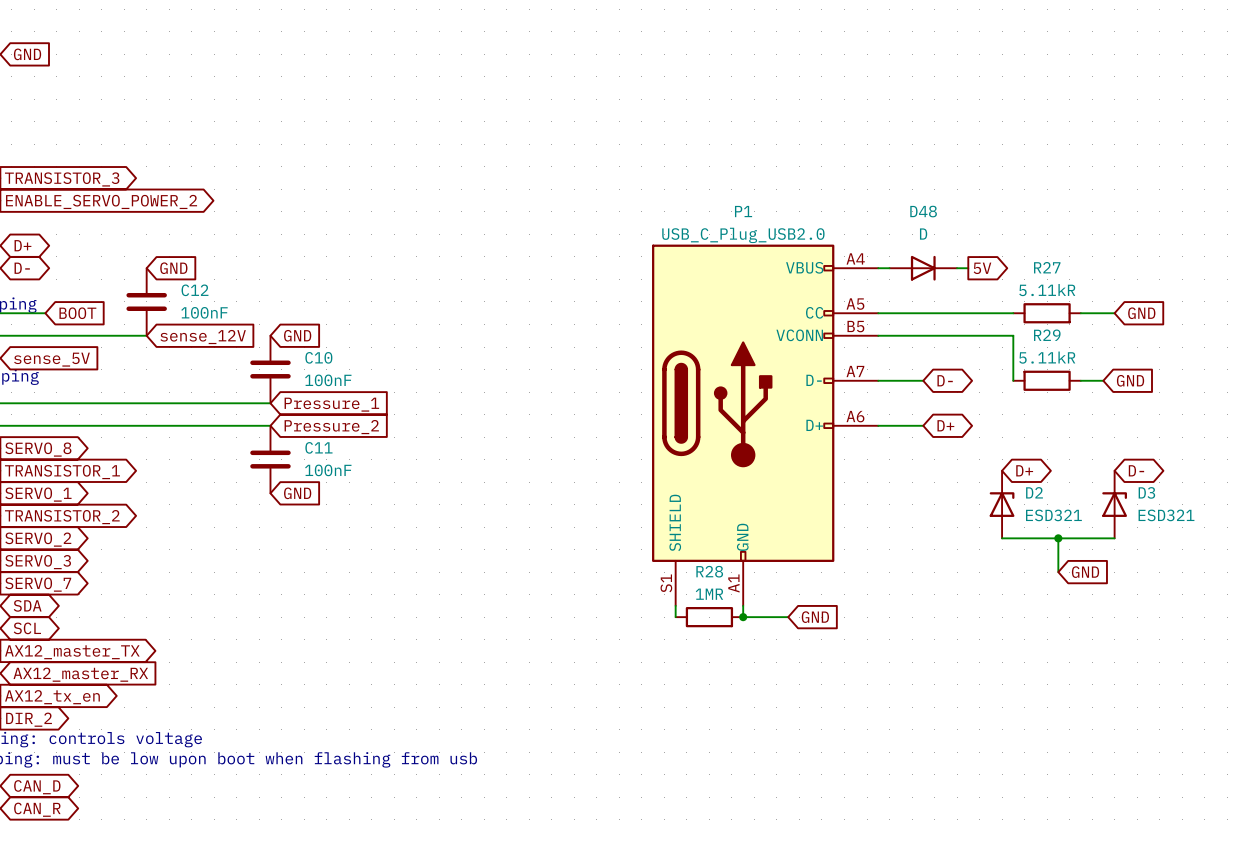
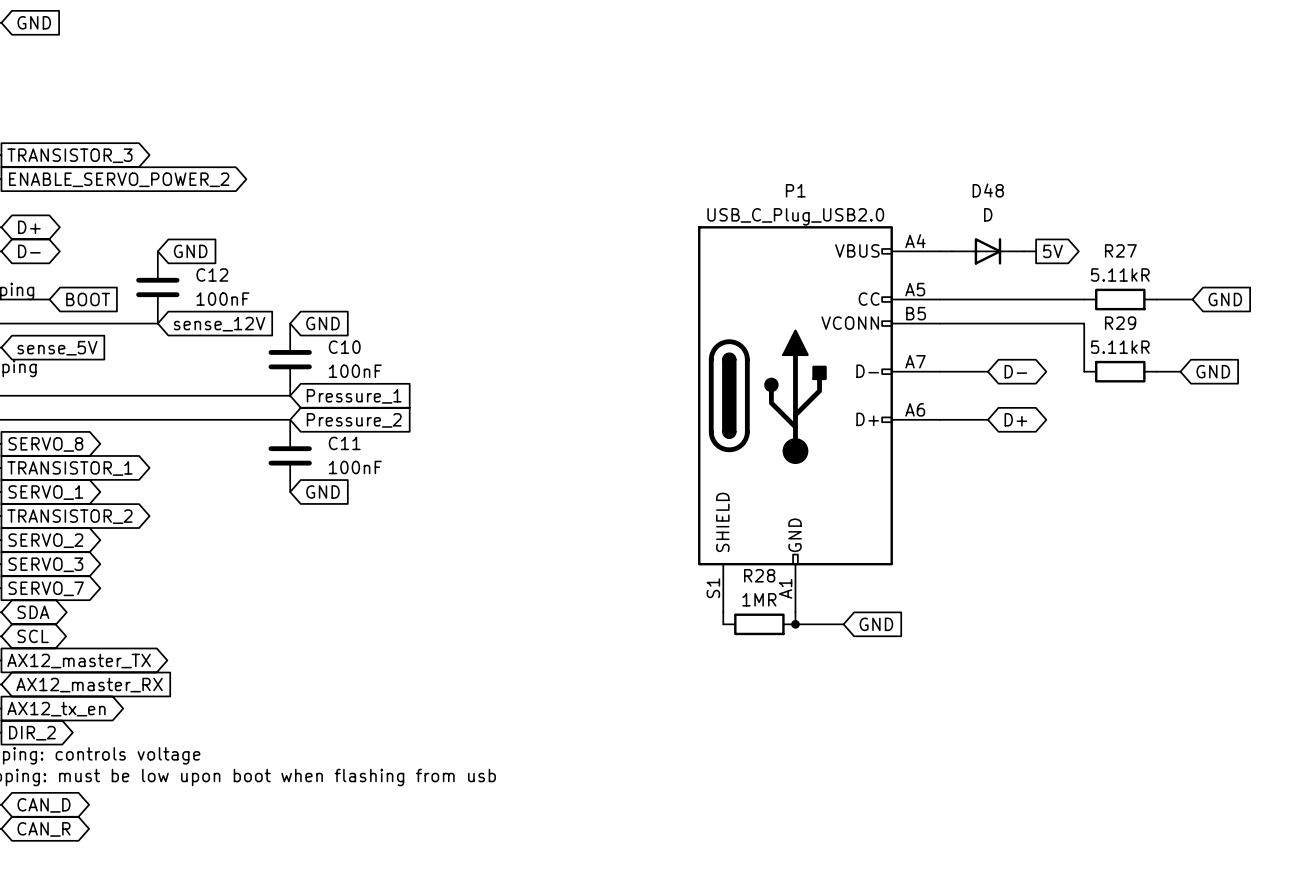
global label: D+ (1024, 470) -> none
global label: D- (1136, 470) -> none
D2: ESD321 (1002, 504) -> none
D3: ESD321 (1114, 504) -> none
wire: (1002, 538) (1114, 538) -> none
wire: (1058, 538) (1058, 572) -> none
junction: (1058, 538) -> none
global label: GND (1085, 572) -> none

